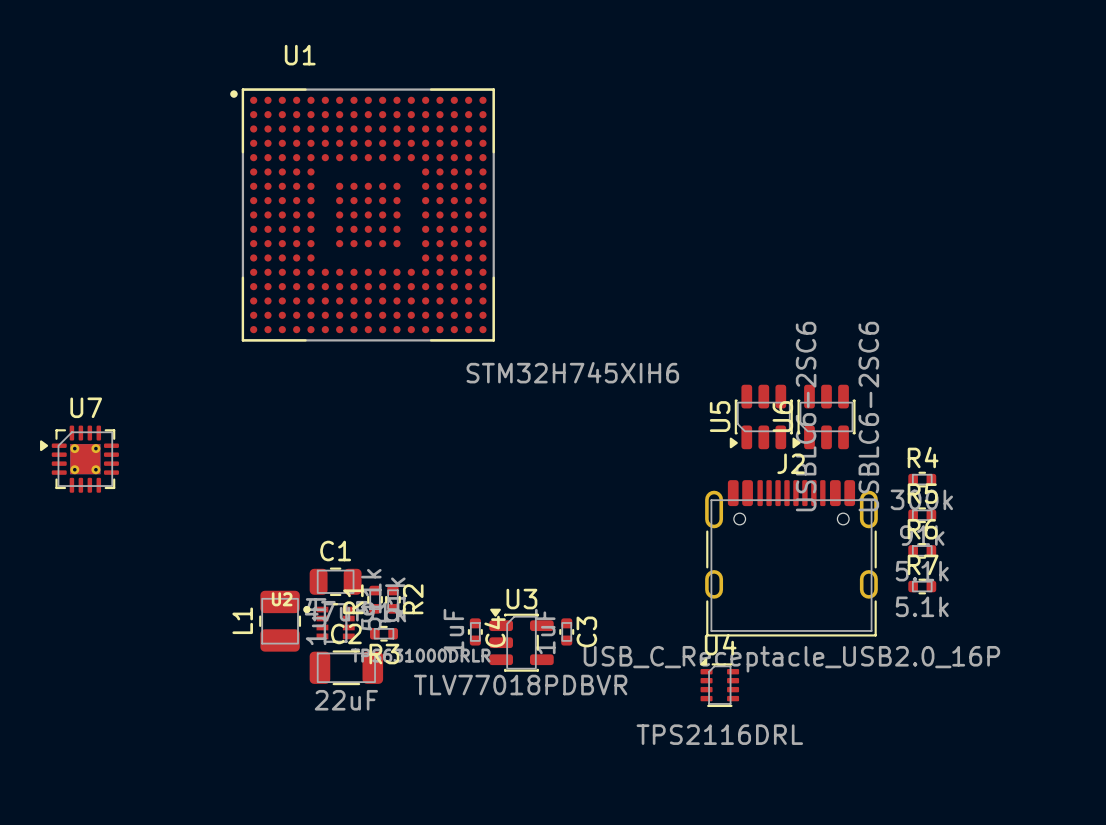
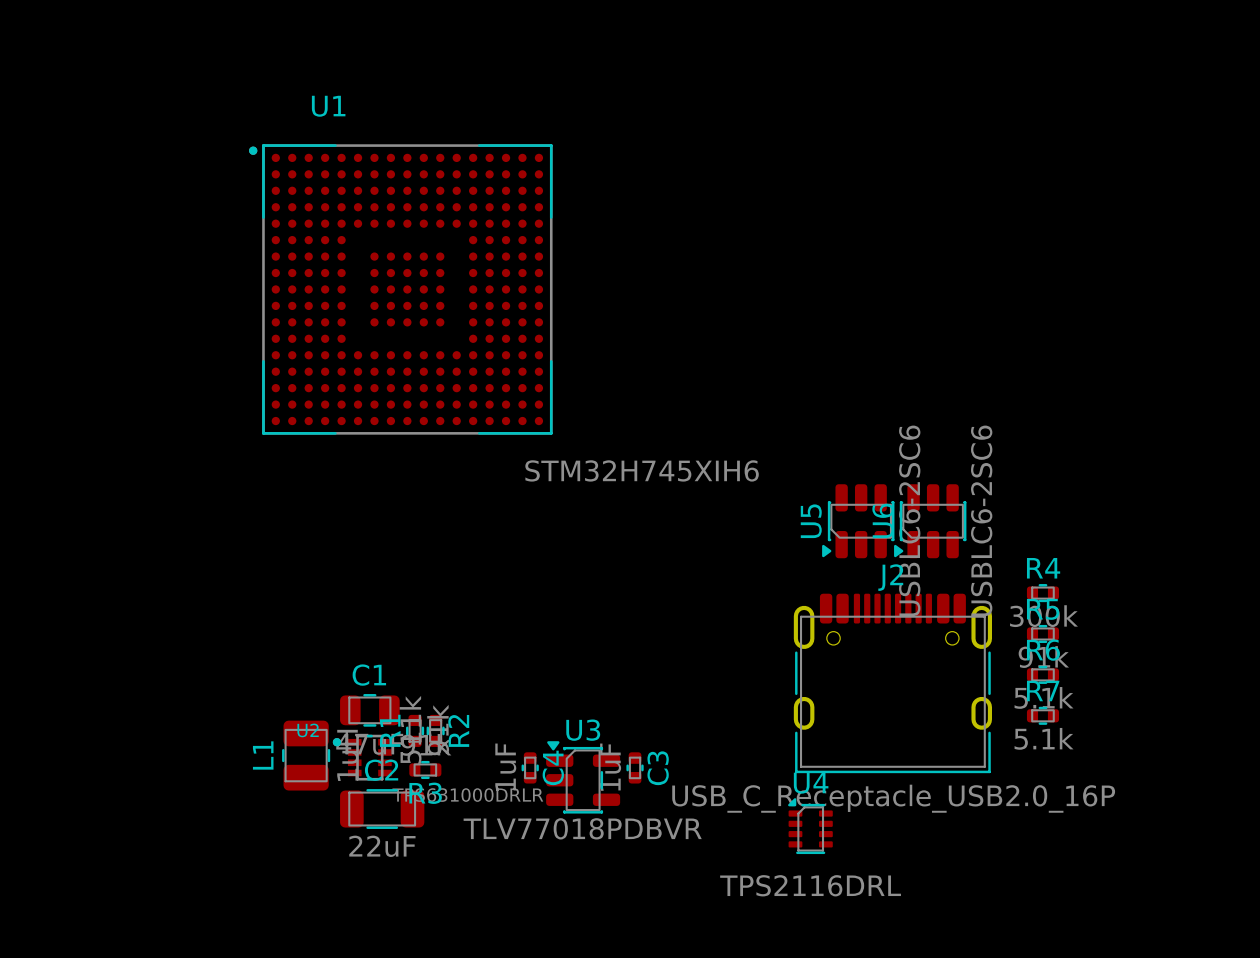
U7: (79, 459) -> none

